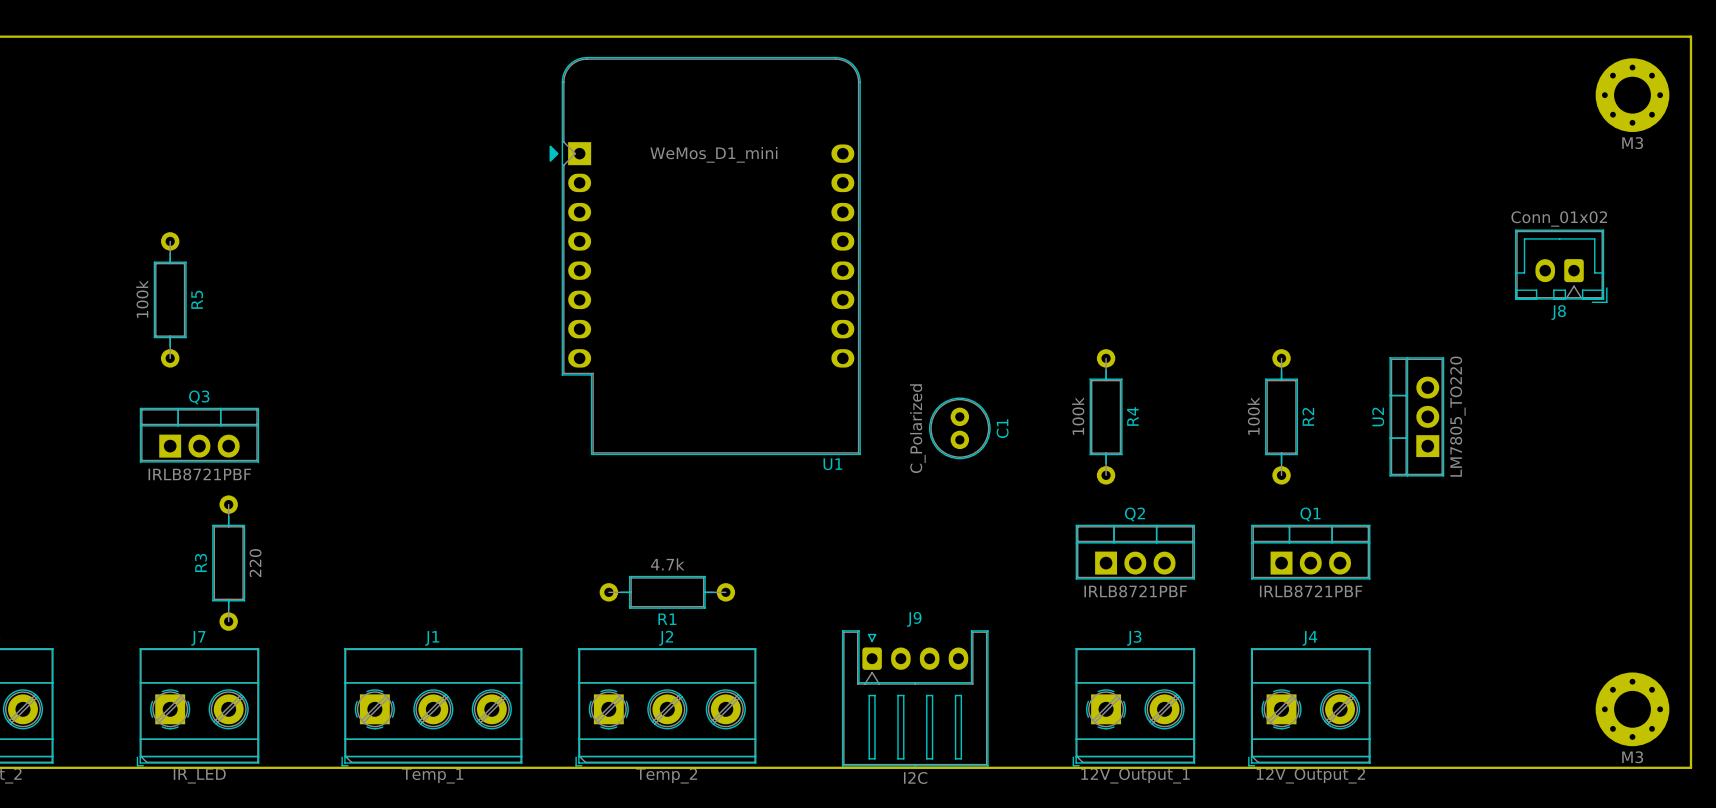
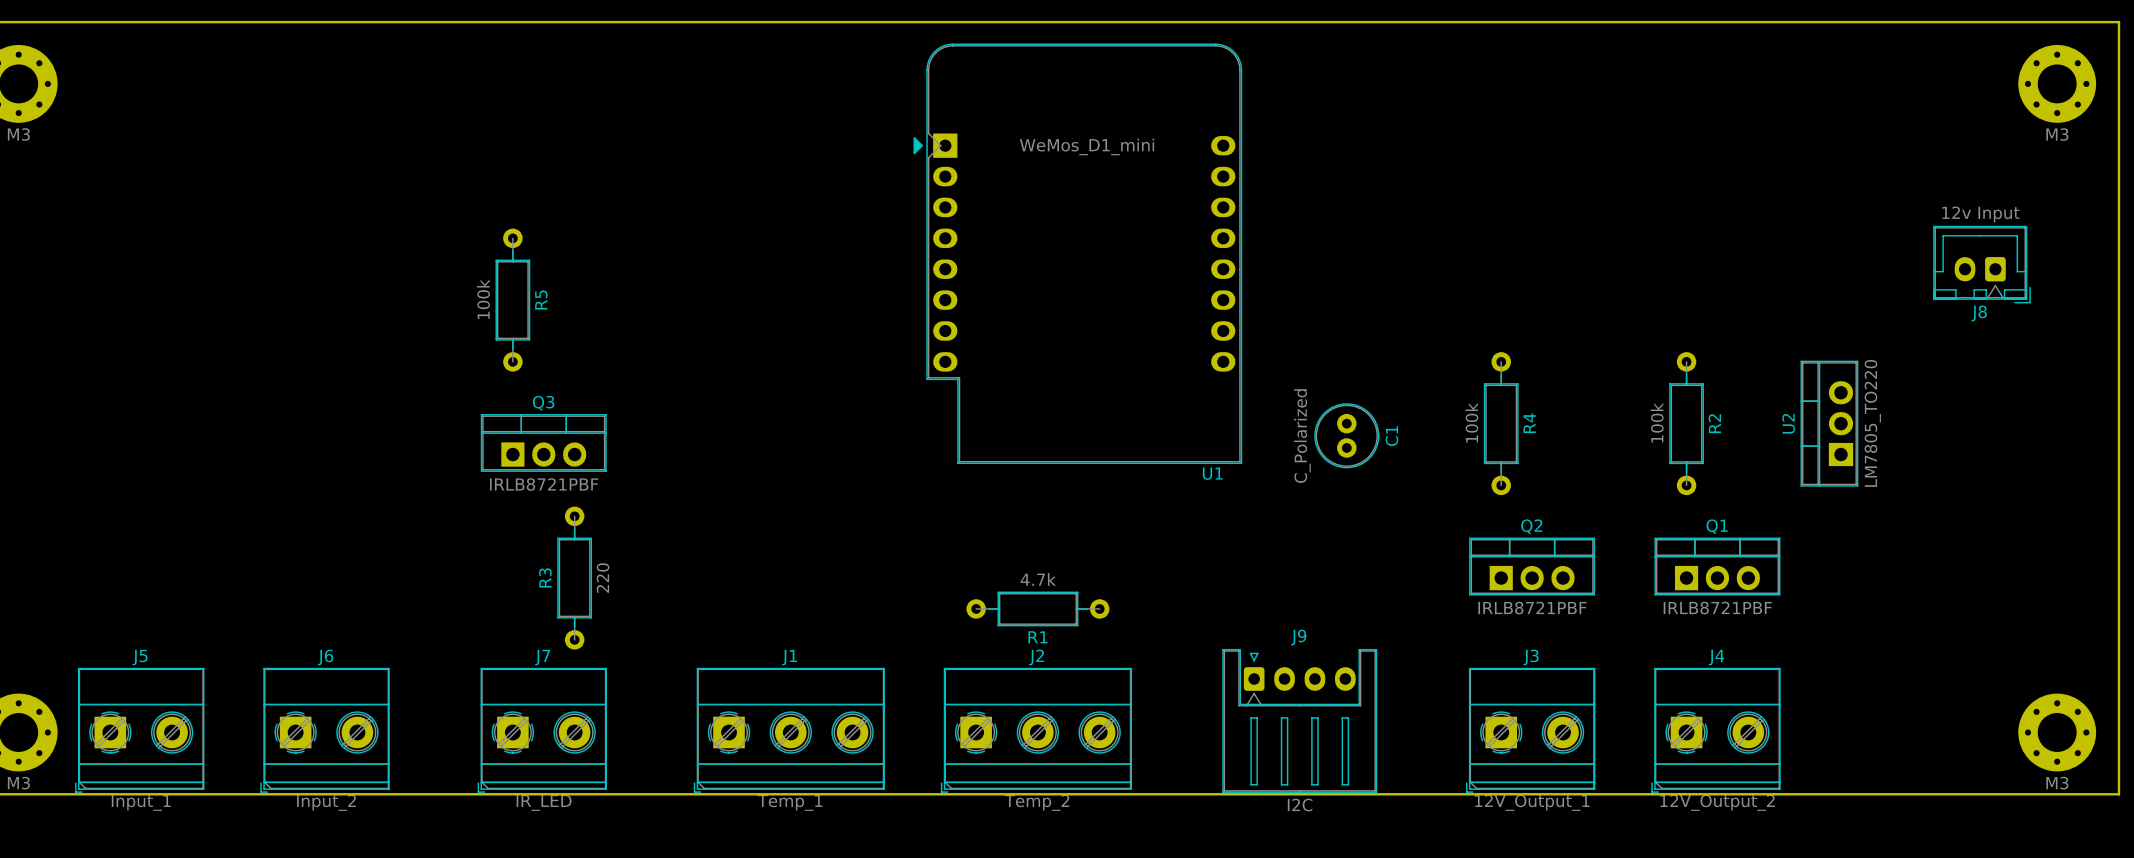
J8 value: Conn_01x02 (1559, 219) -> 12v Input (1980, 214)

